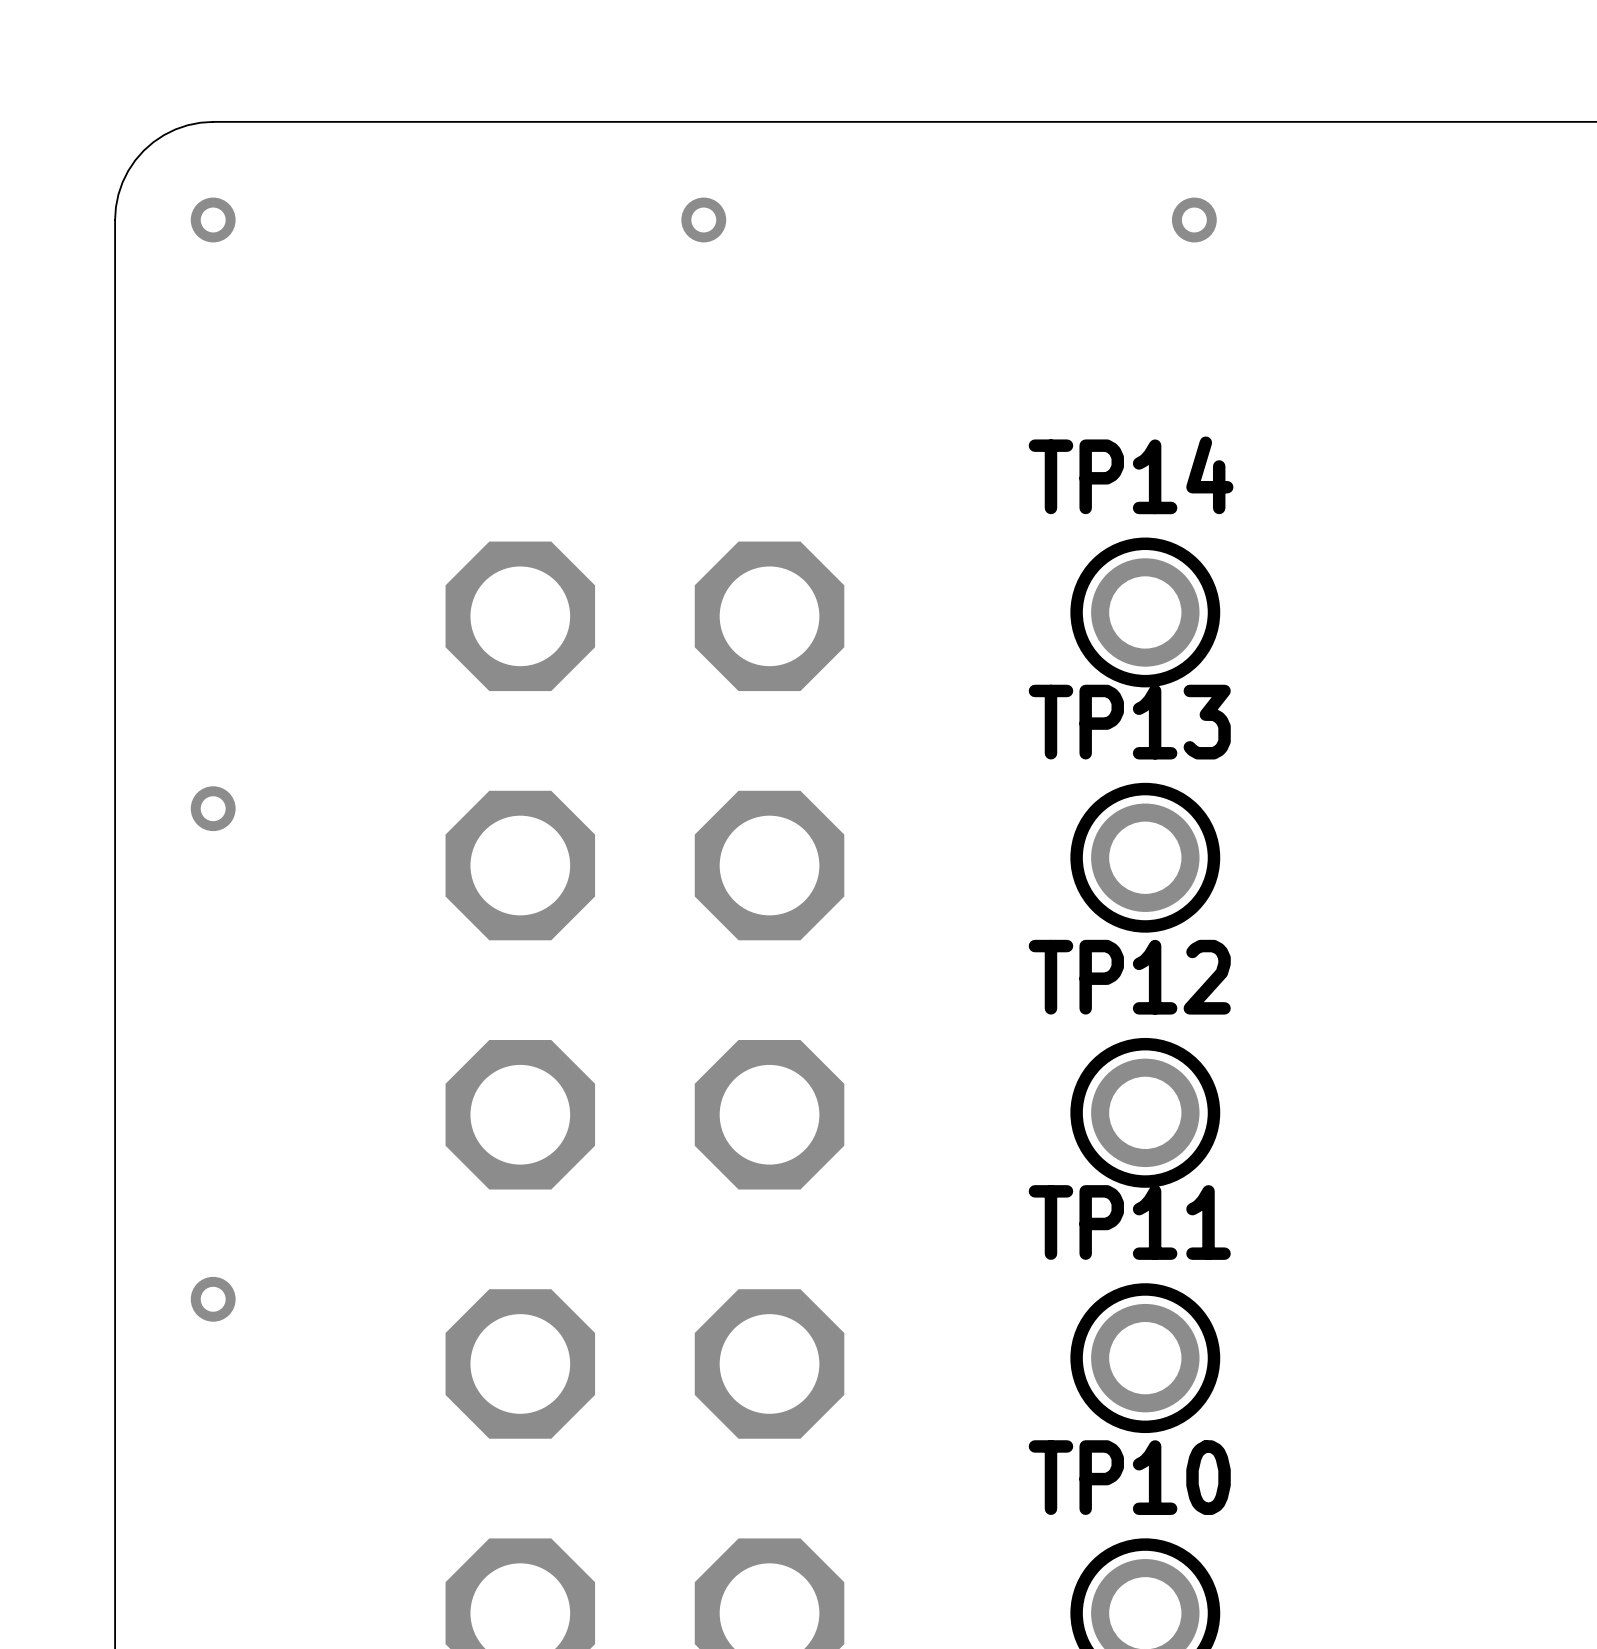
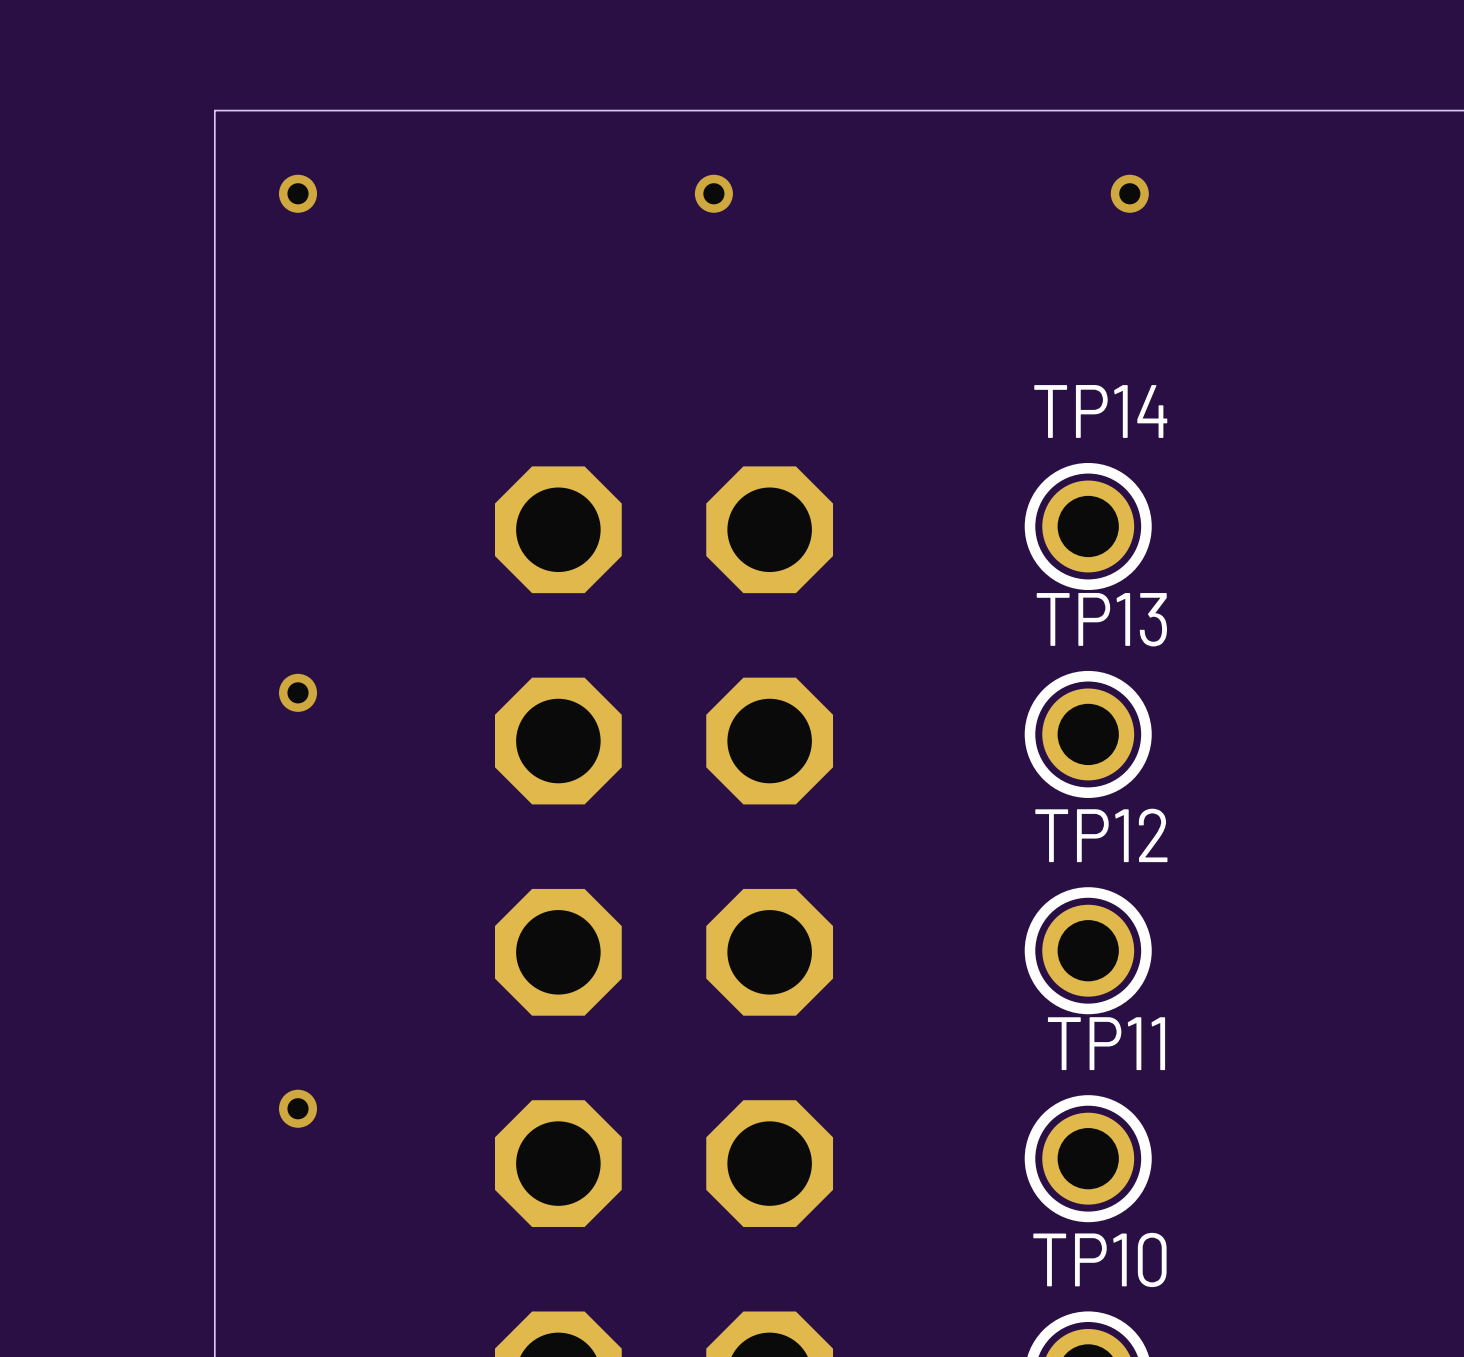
board edge: (213, 121) (187, 125) (175, 129) (153, 142) (143, 150) (135, 160) (122, 182) (118, 194) (115, 220) -> (298, 110) (214, 110) (214, 193)

